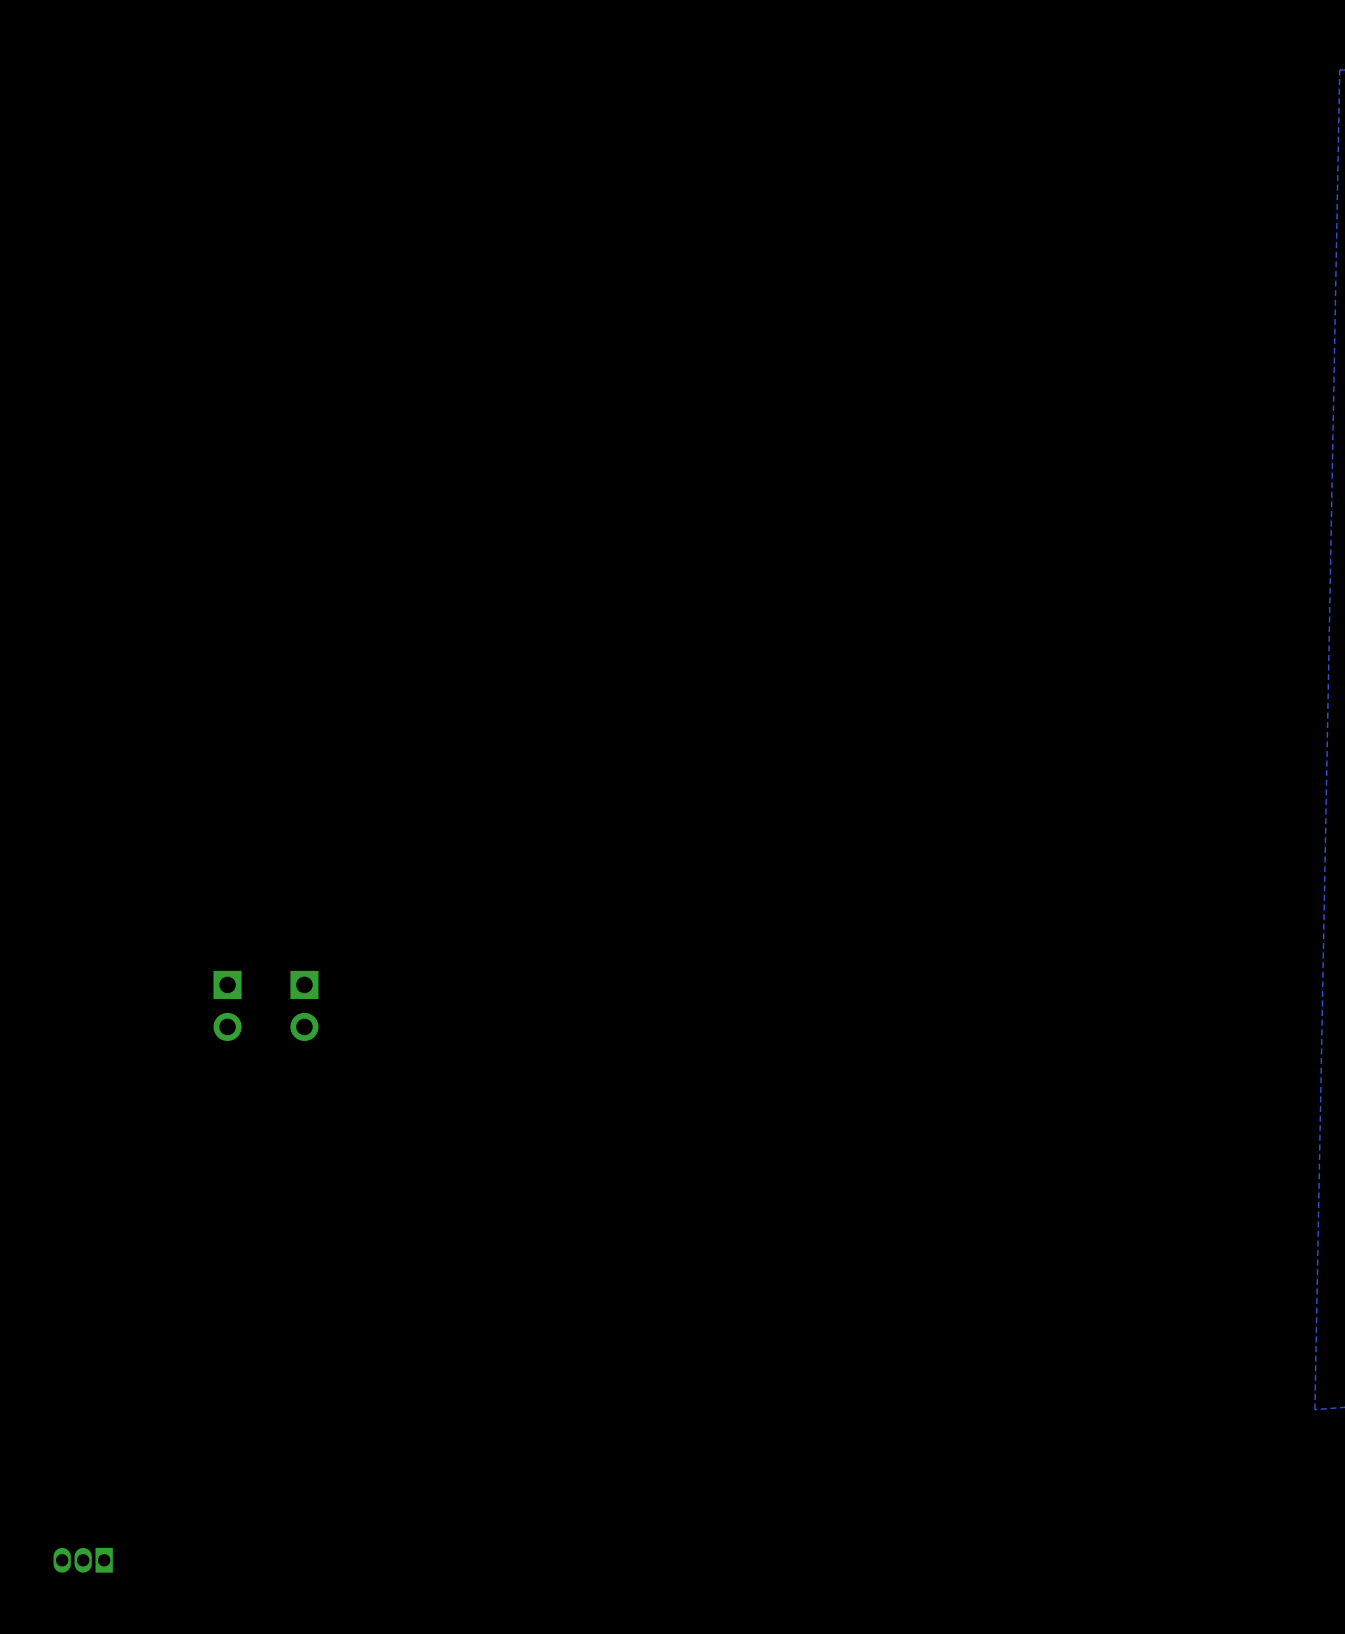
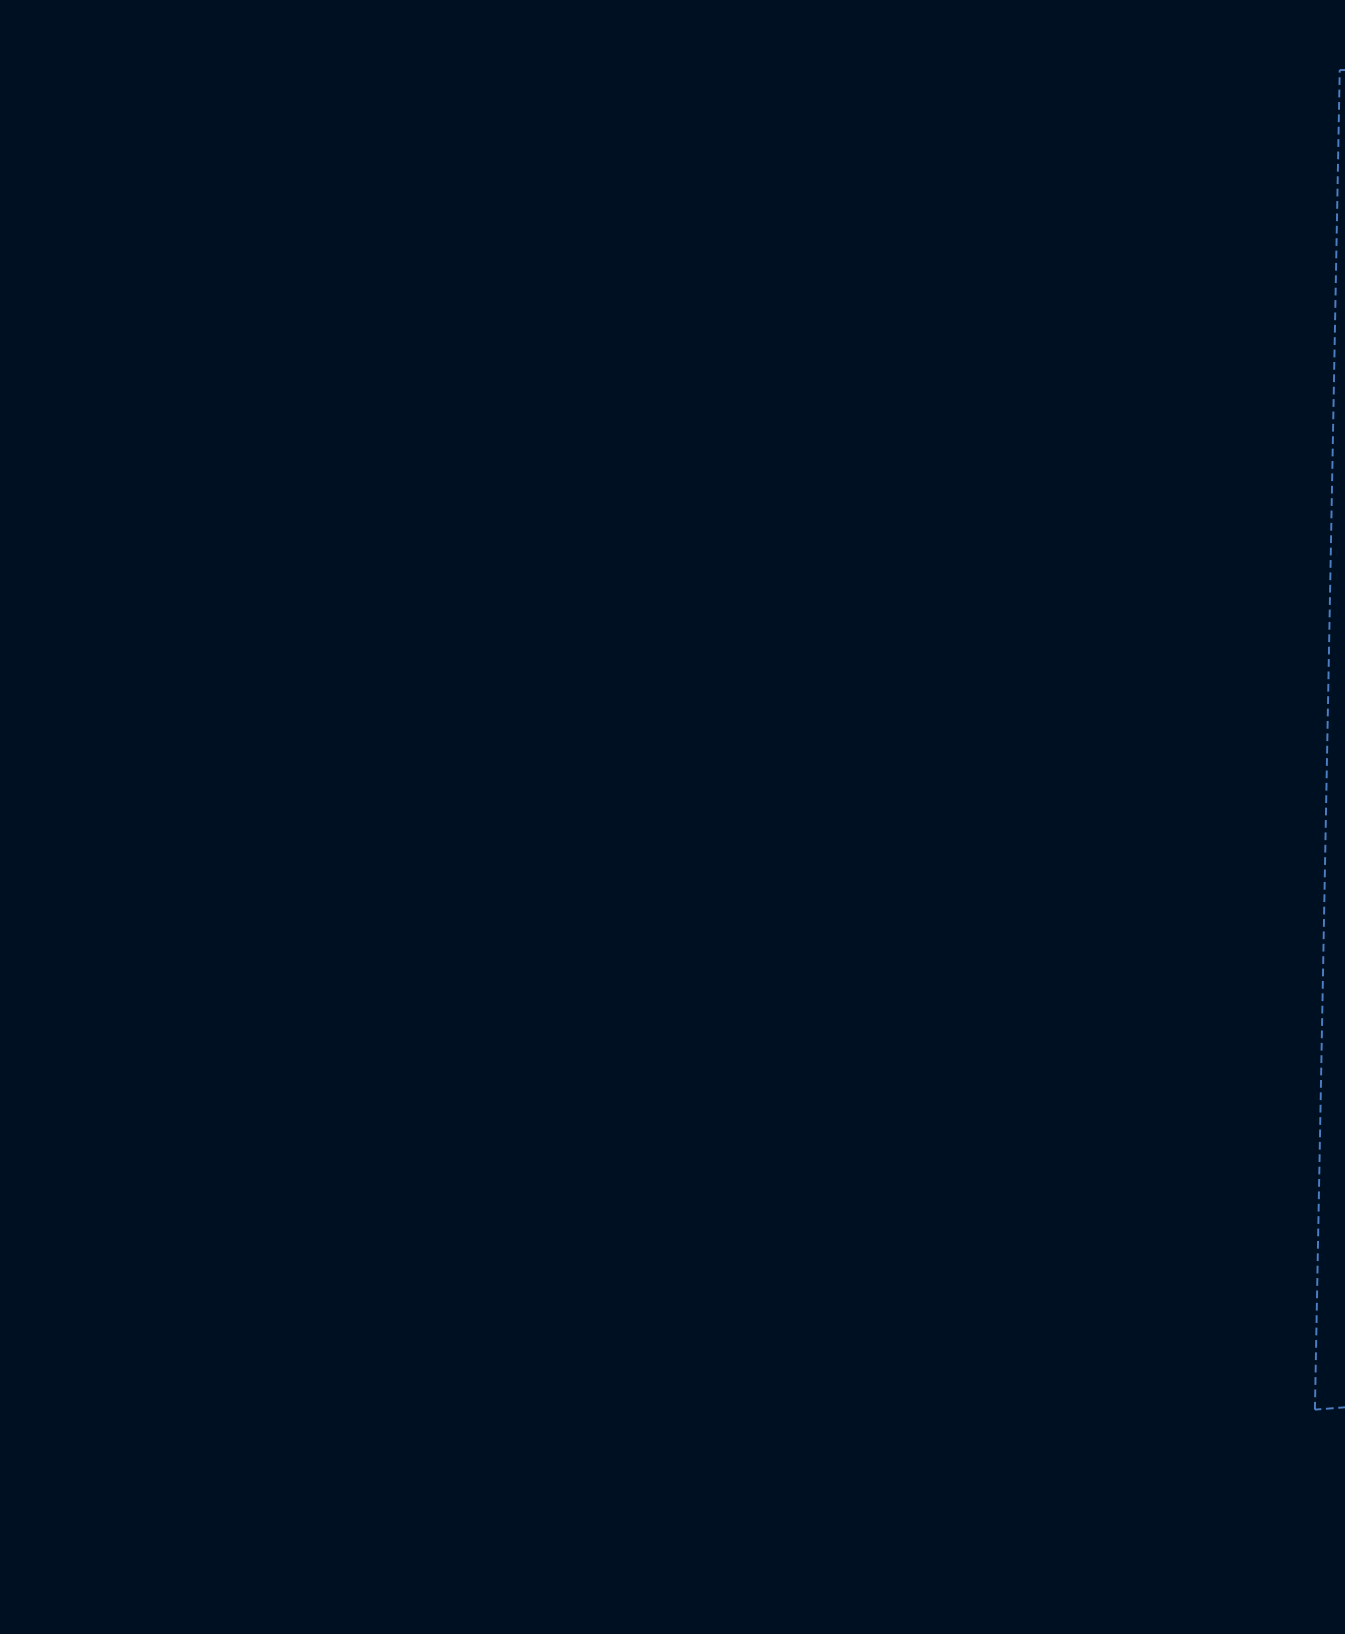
part: (227, 1005) -> none
part: (304, 1005) -> none
part: (83, 1560) -> none

